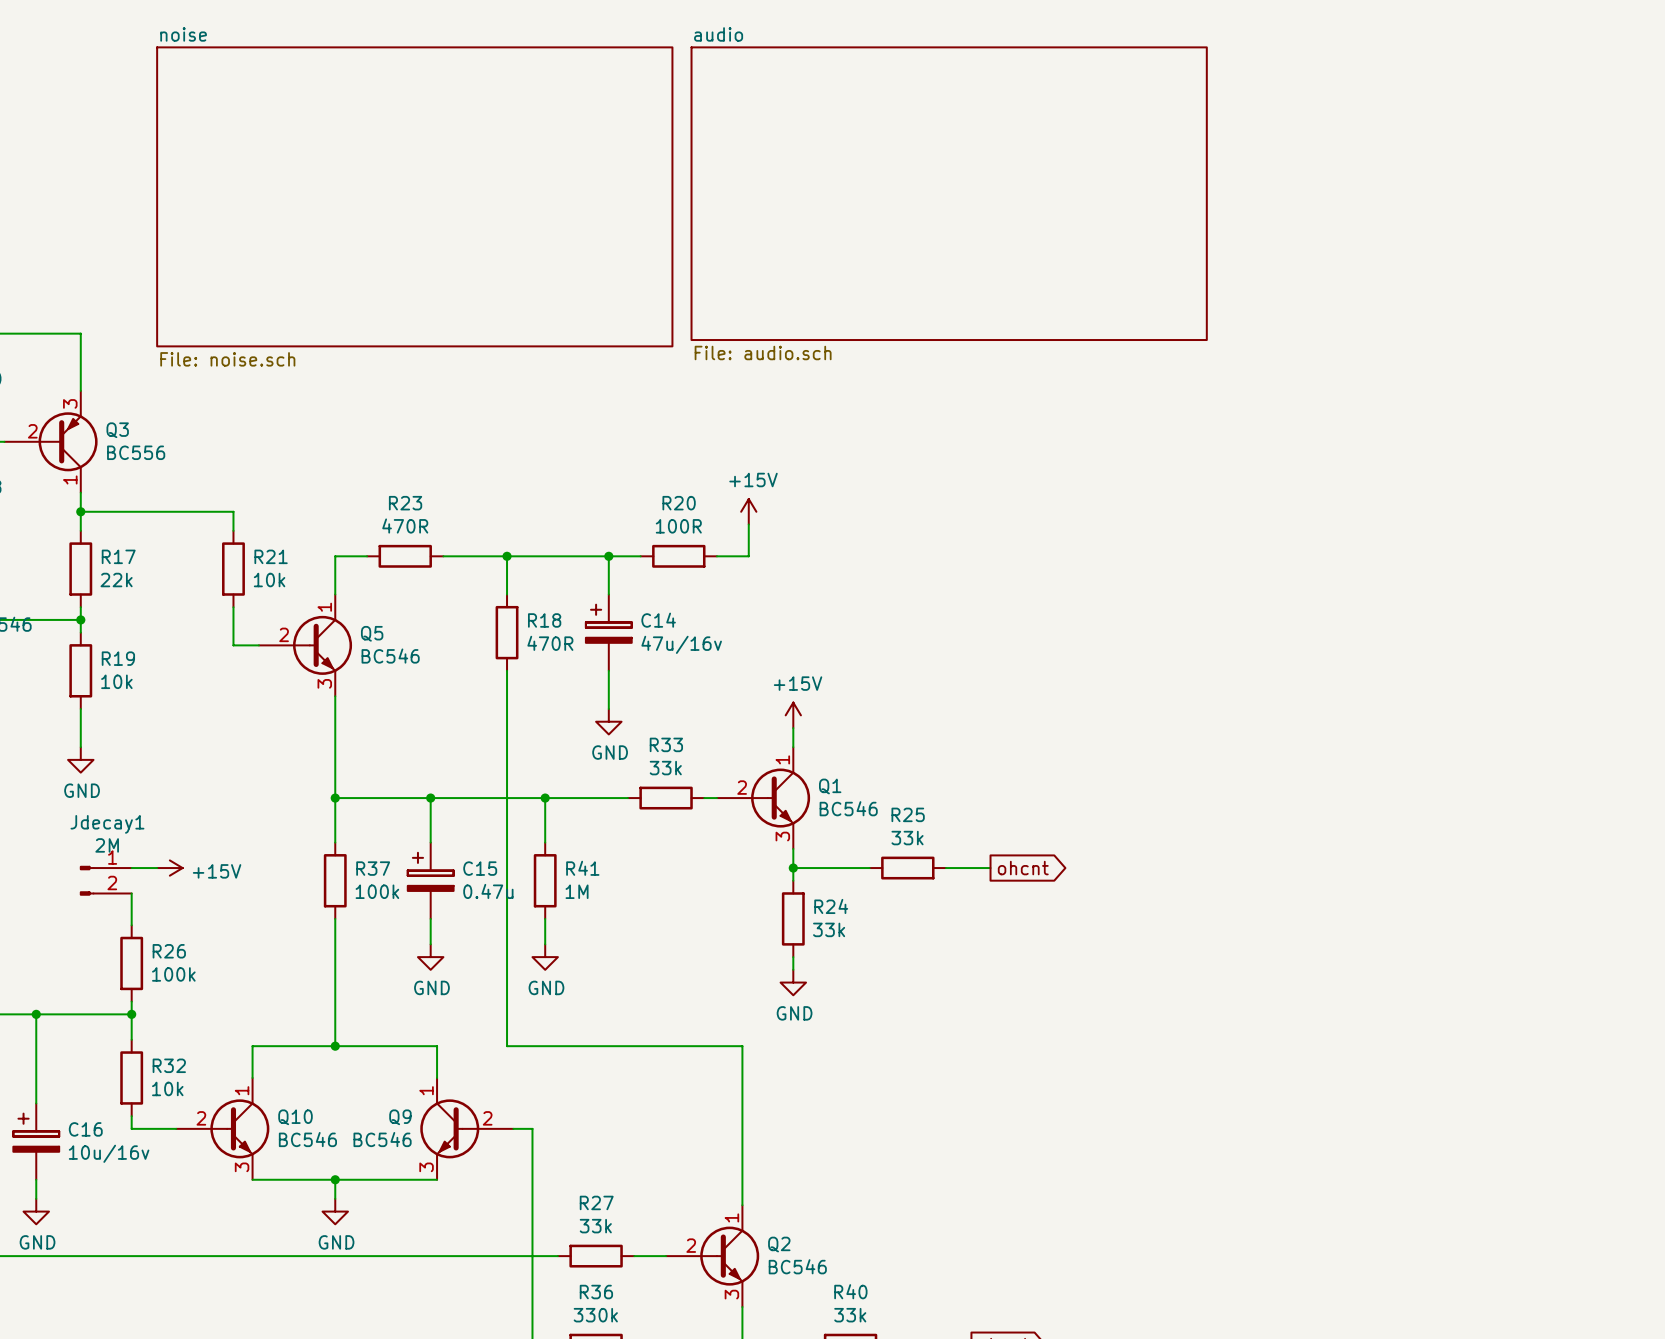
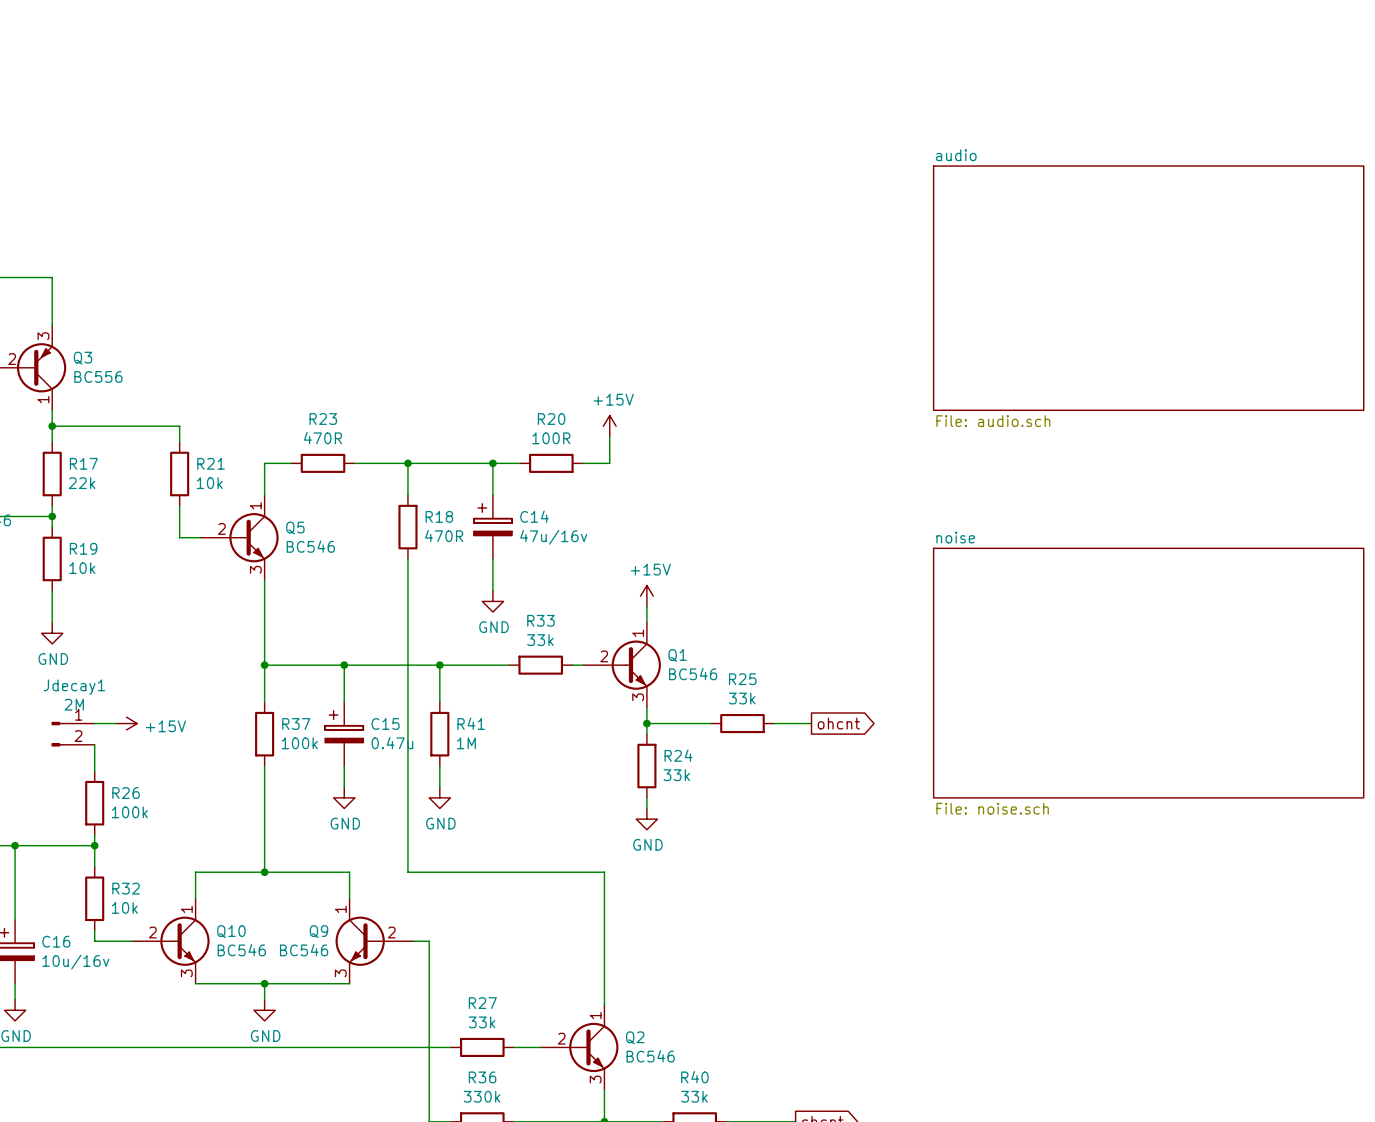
sheet audio: File: audio.sch (949, 193) -> none
sheet noise: File: noise.sch (414, 196) -> none
sheet audio: none -> File: audio.sch (1148, 288)
sheet noise: none -> File: noise.sch (1148, 673)

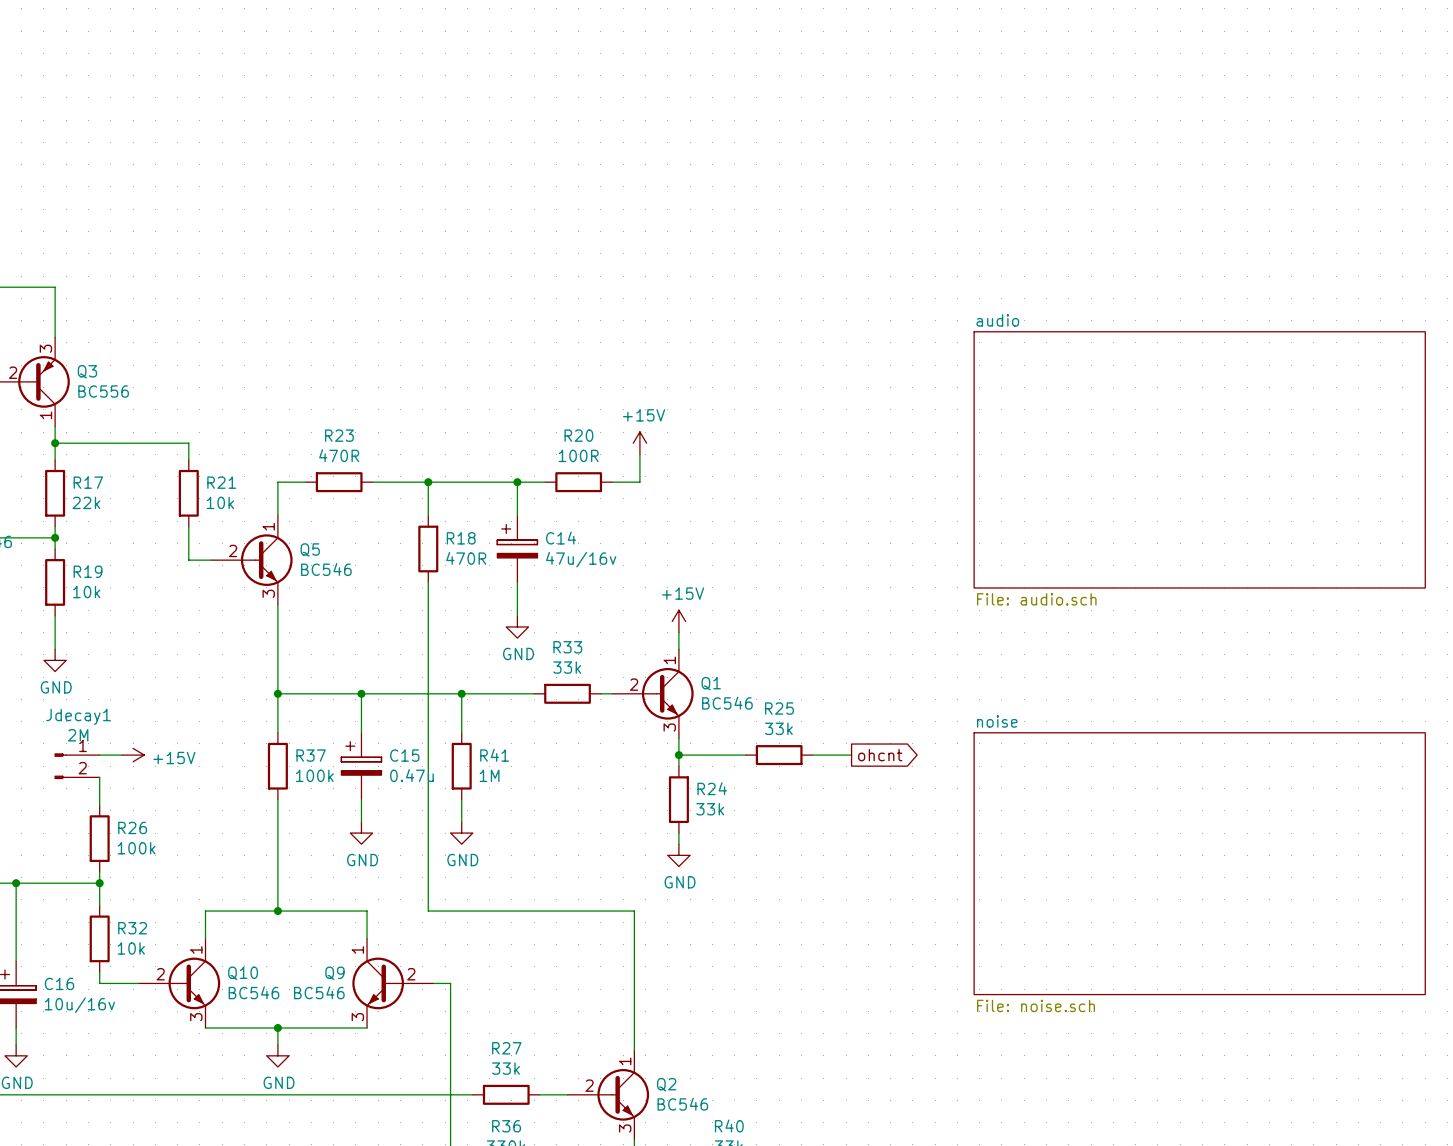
sheet audio position: (1148, 288) -> (1199, 459)
sheet noise position: (1148, 673) -> (1199, 863)

